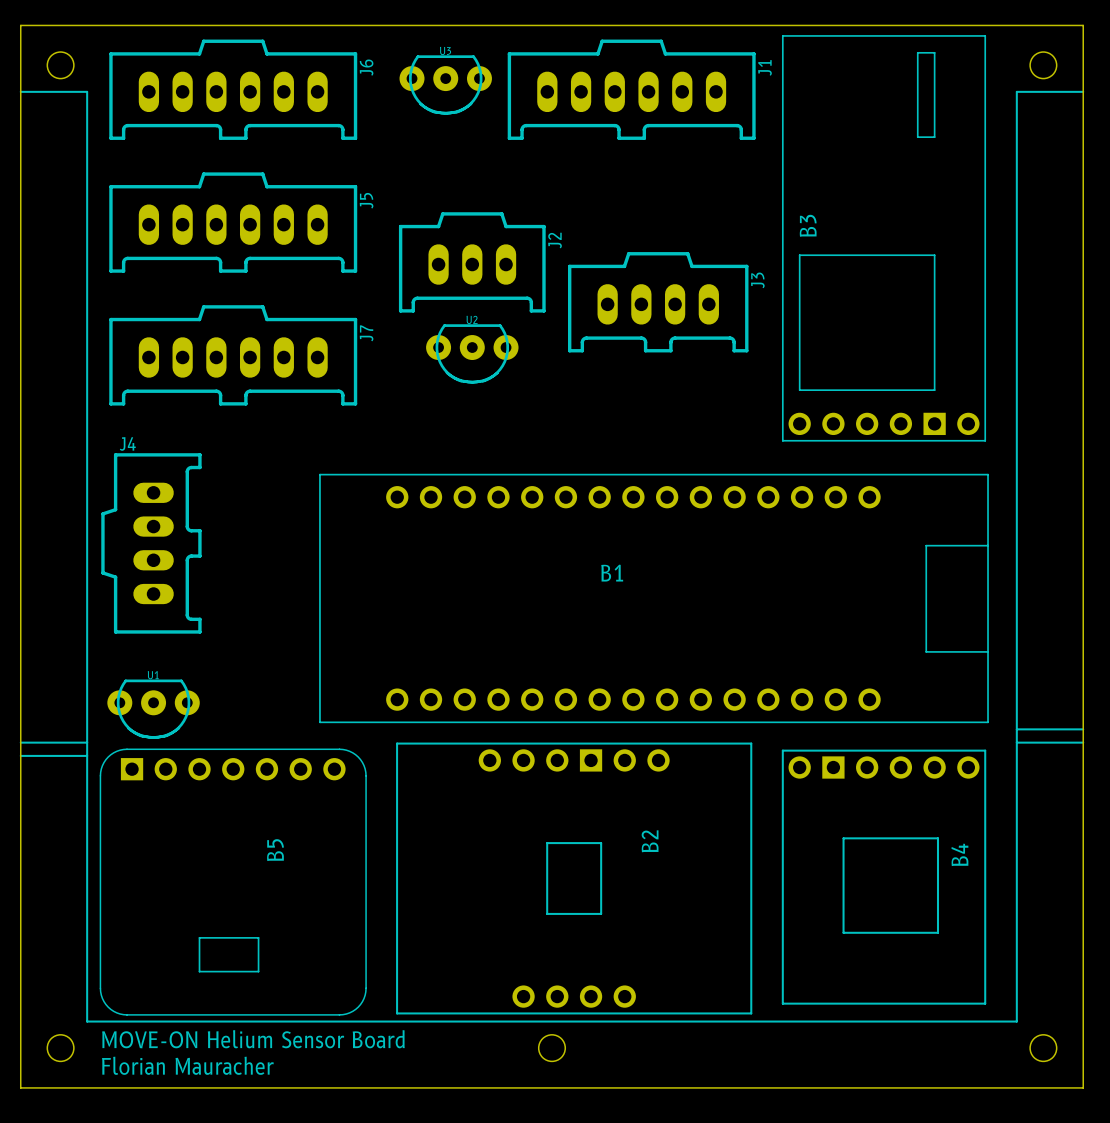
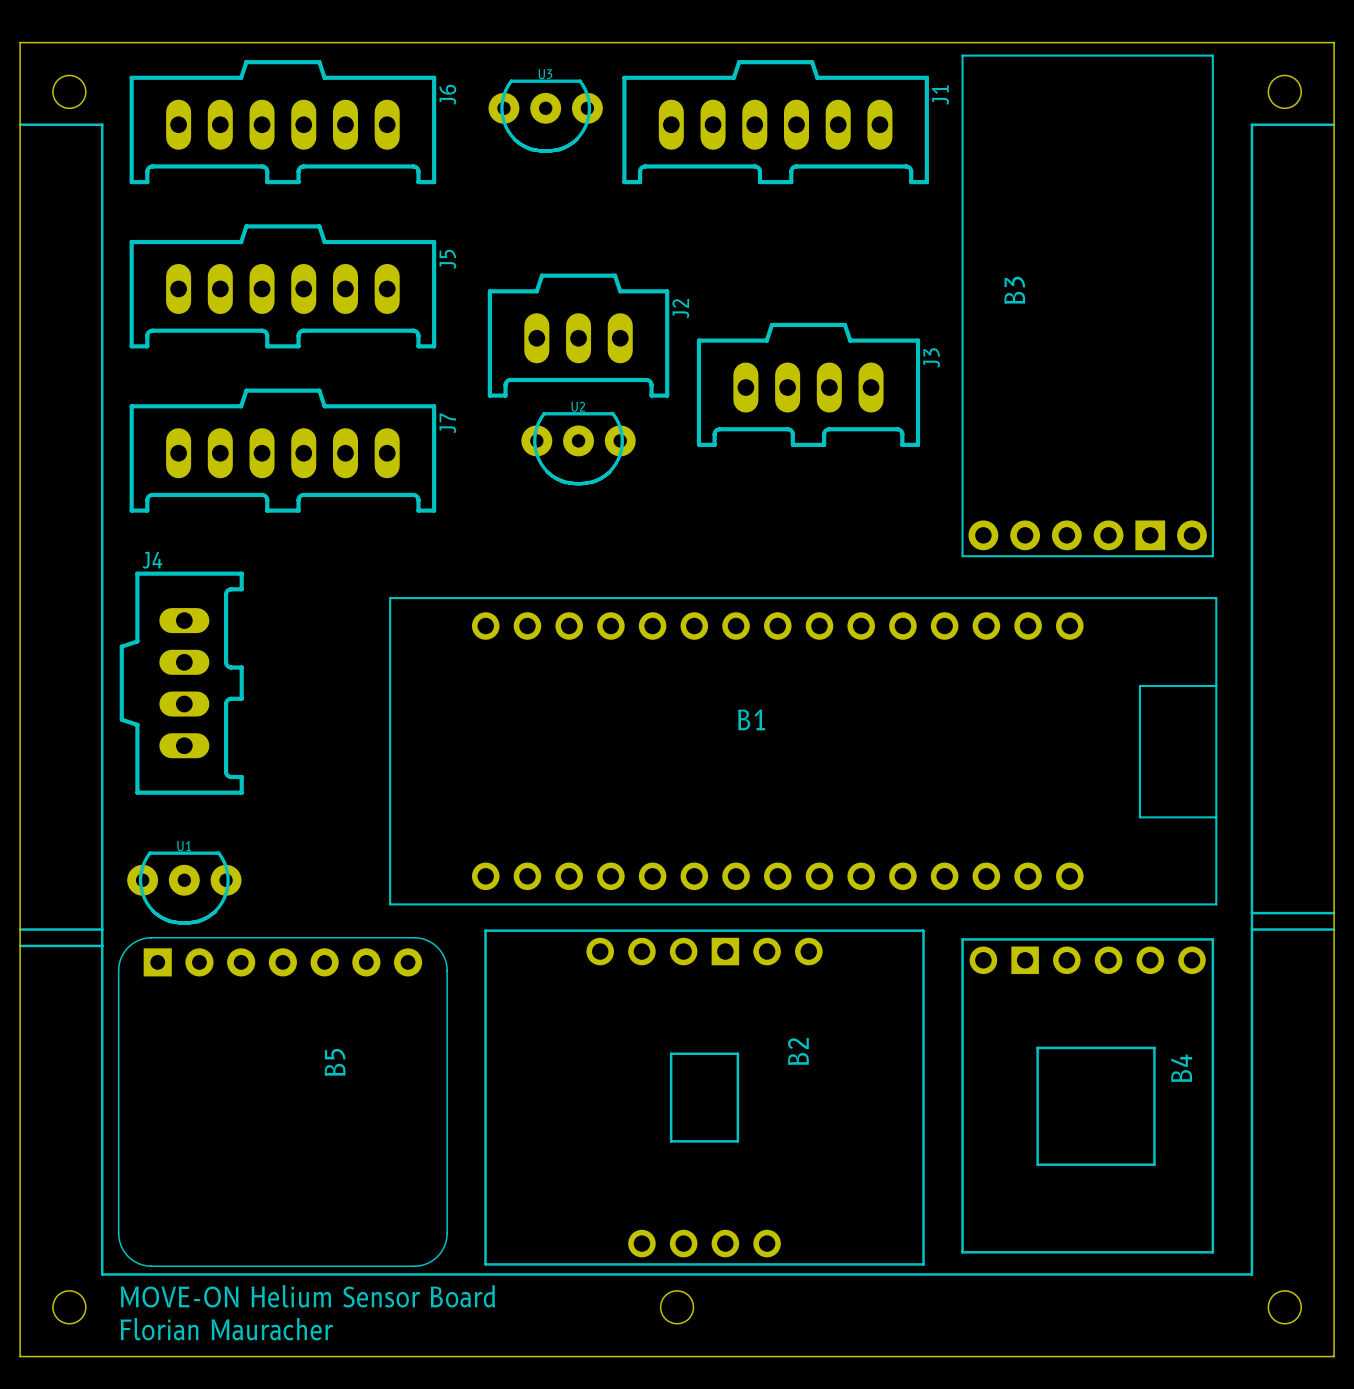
B3 footprint: [781, 35, 987, 442] -> [961, 54, 1214, 558]
B5 footprint: [100, 749, 367, 1015] -> [118, 937, 448, 1267]

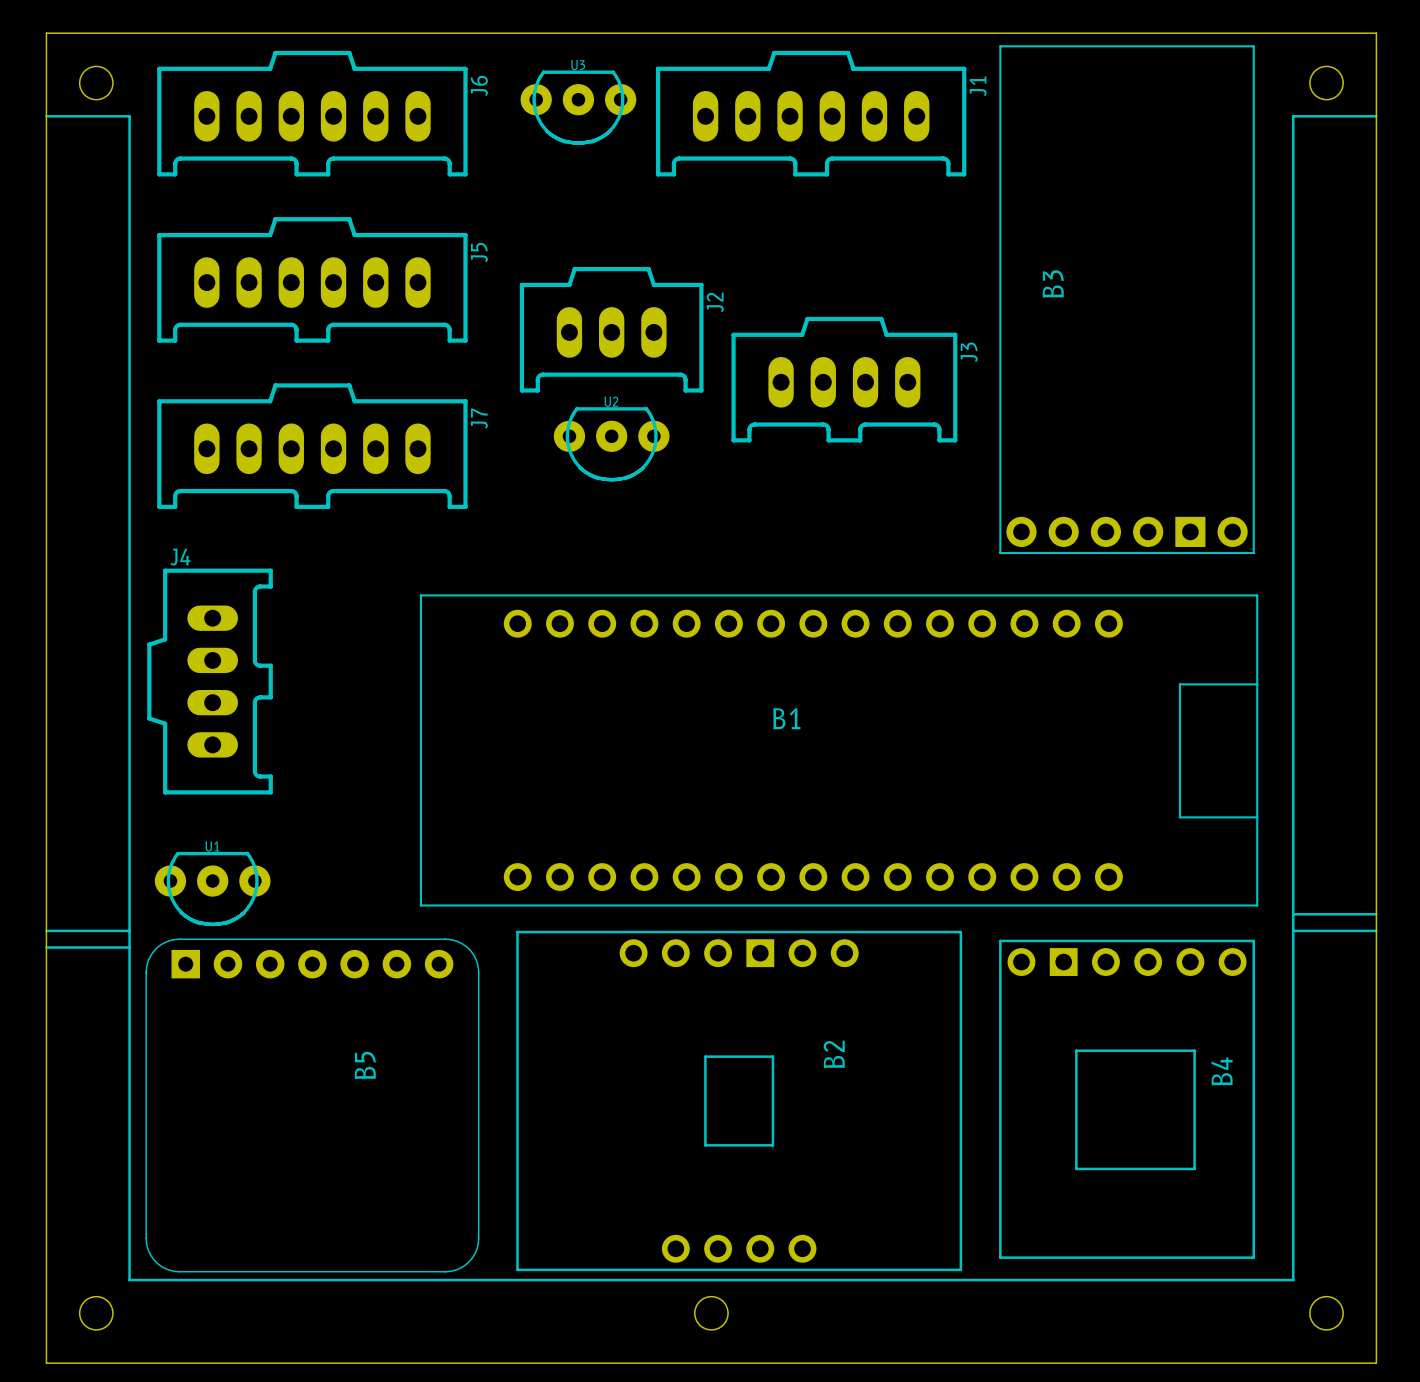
text: MOVE-ON Helium Sensor Board (307, 1296) -> none
text: Florian Mauracher (226, 1329) -> none

